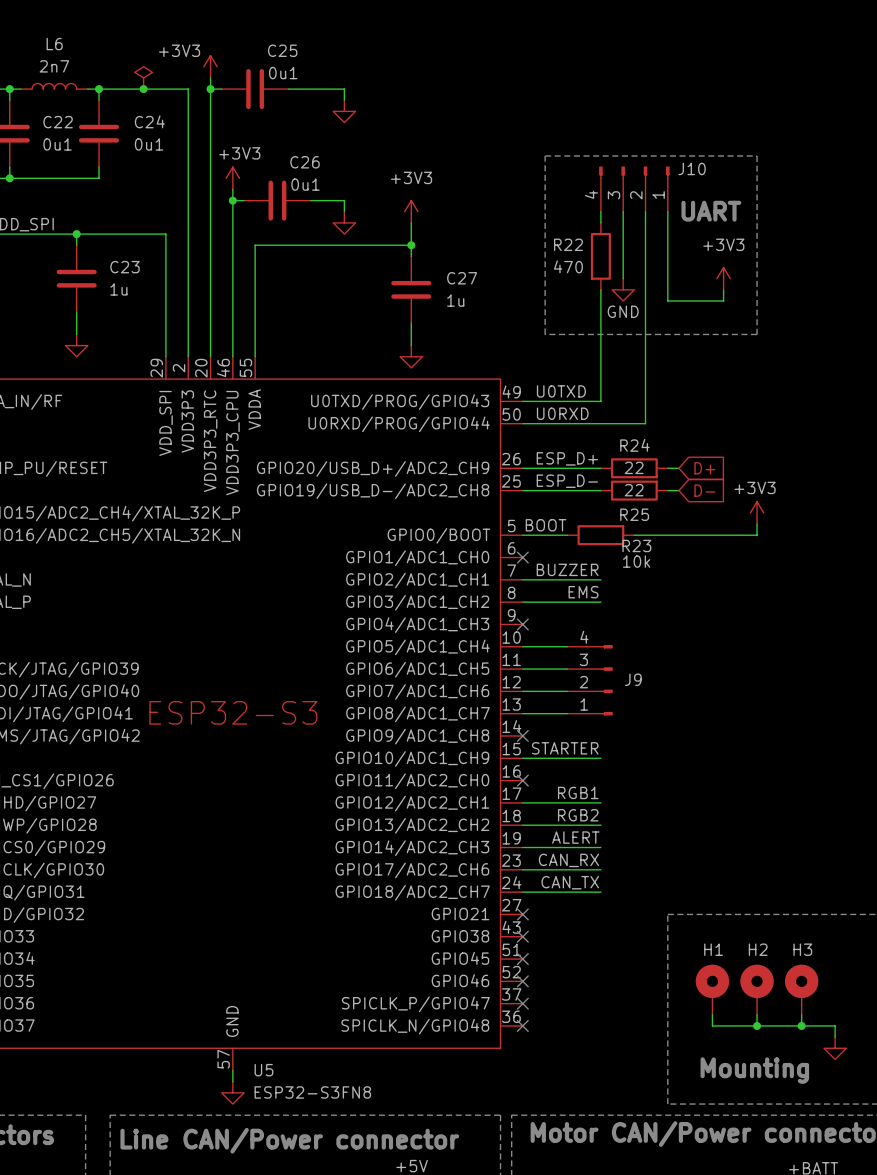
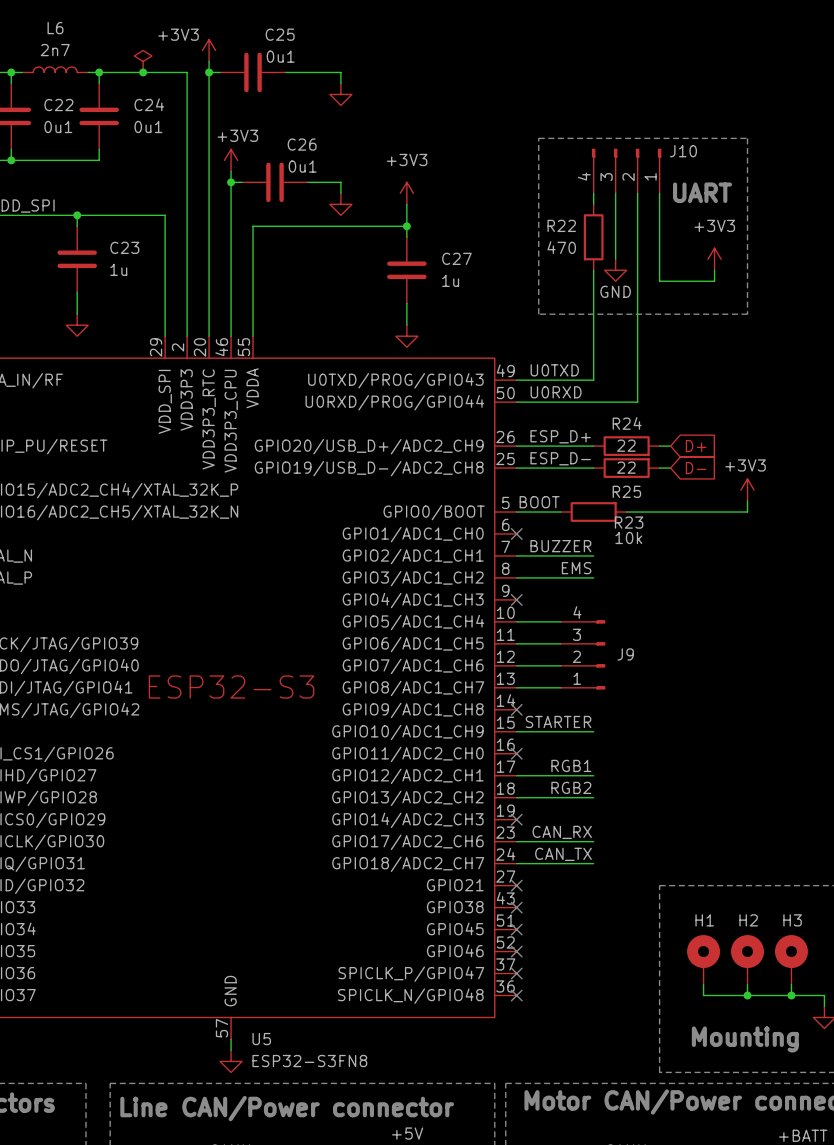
label: ALERT (575, 837) -> none
wire: (522, 847) (600, 847) -> none
no-connect mark: none -> (516, 819)

